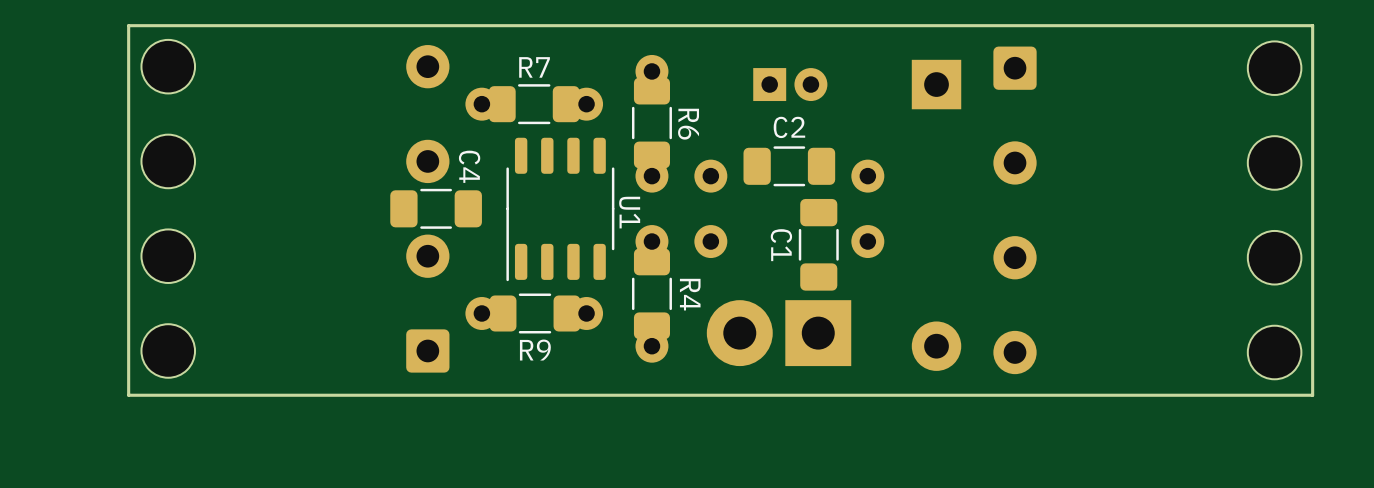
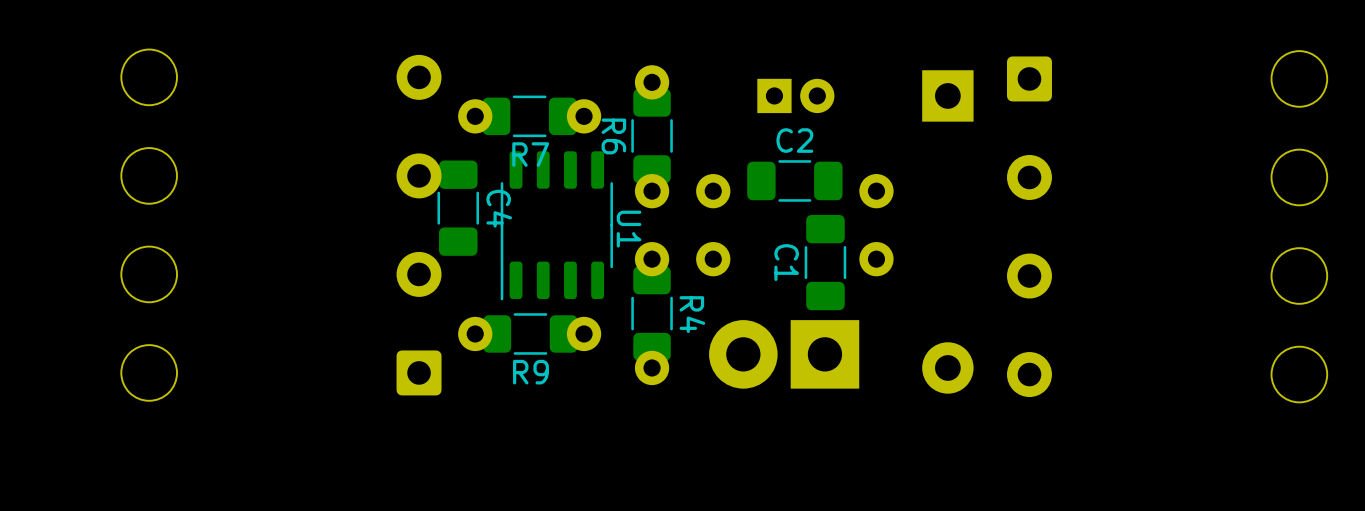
board edge: (1312, 25) (128, 25) (128, 395) (1312, 395) (1312, 25) -> none
R7 name position: R7 (534, 67) -> R7 (530, 154)
R6 name position: R6 (688, 124) -> R6 (613, 136)
C4 rotation: 0° (436, 208) -> 90° clockwise (458, 208)

